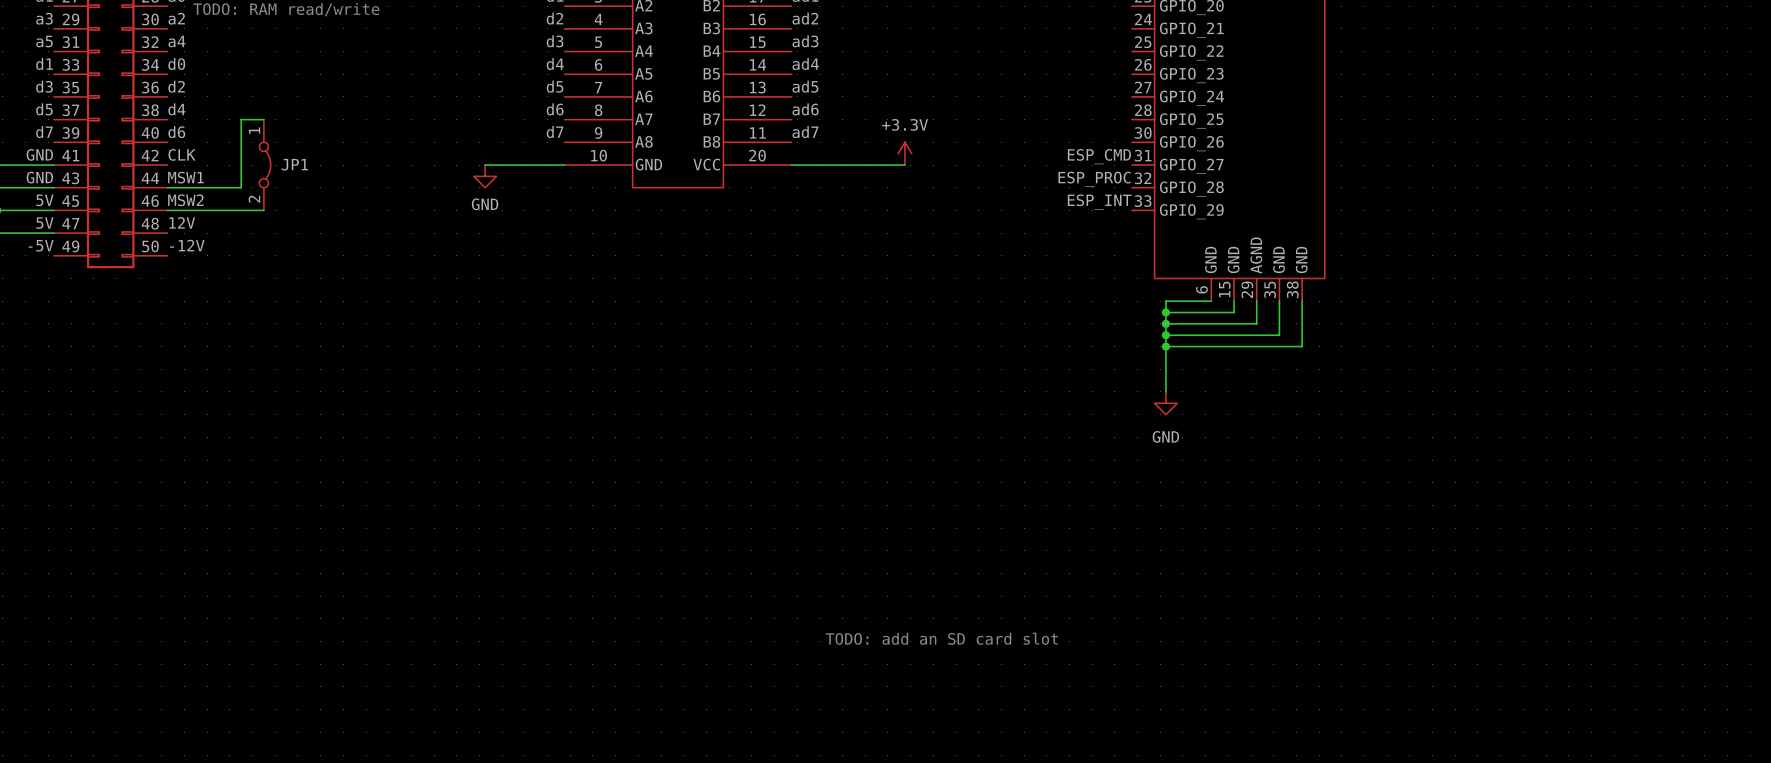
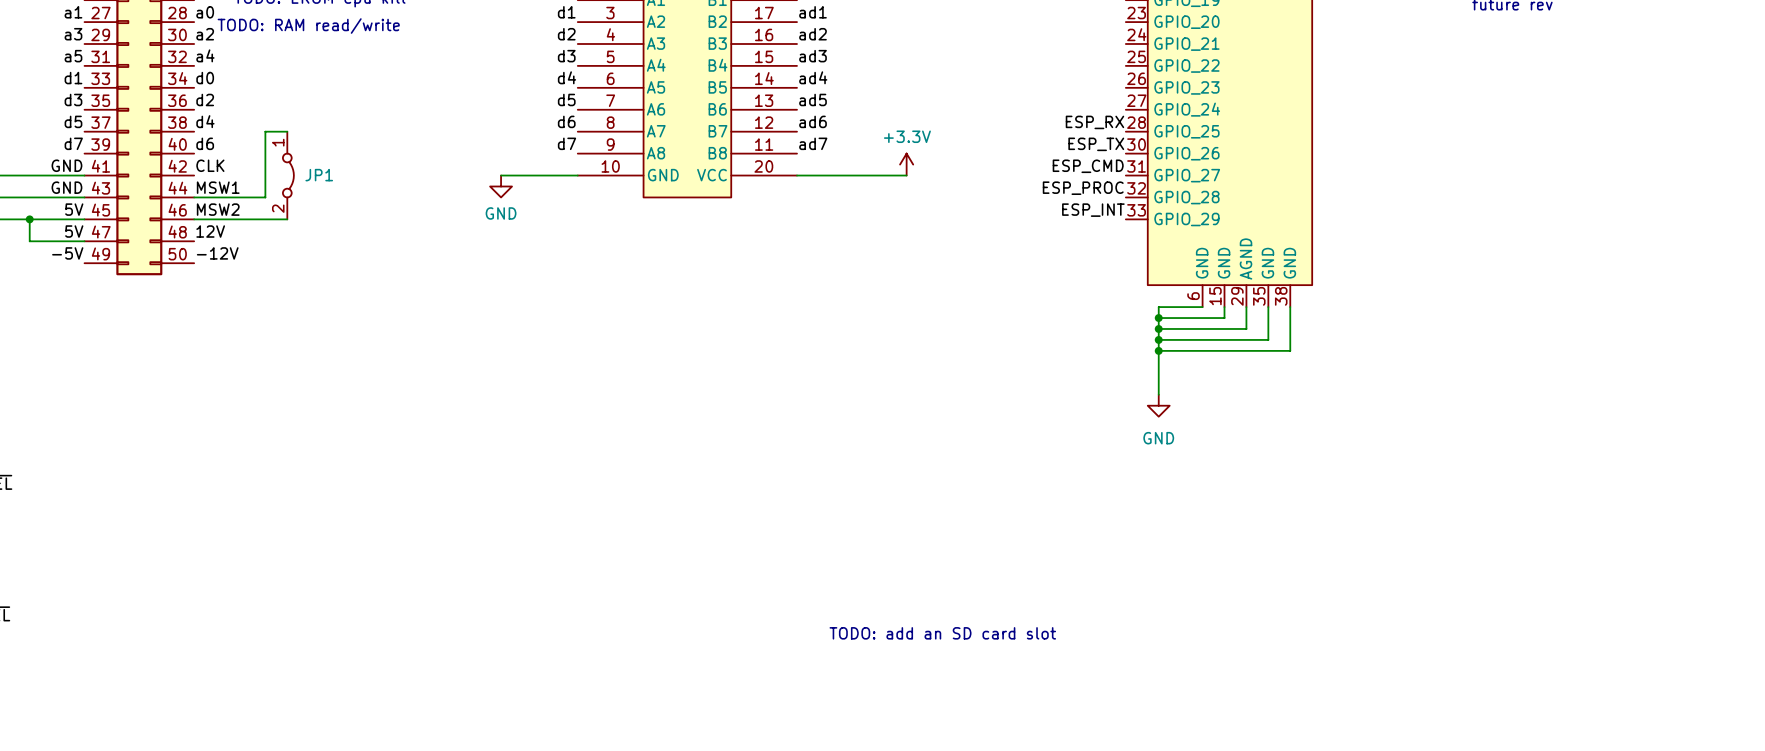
label: none -> ESP_RX (1094, 122)
label: none -> ESP_TX (1096, 144)

